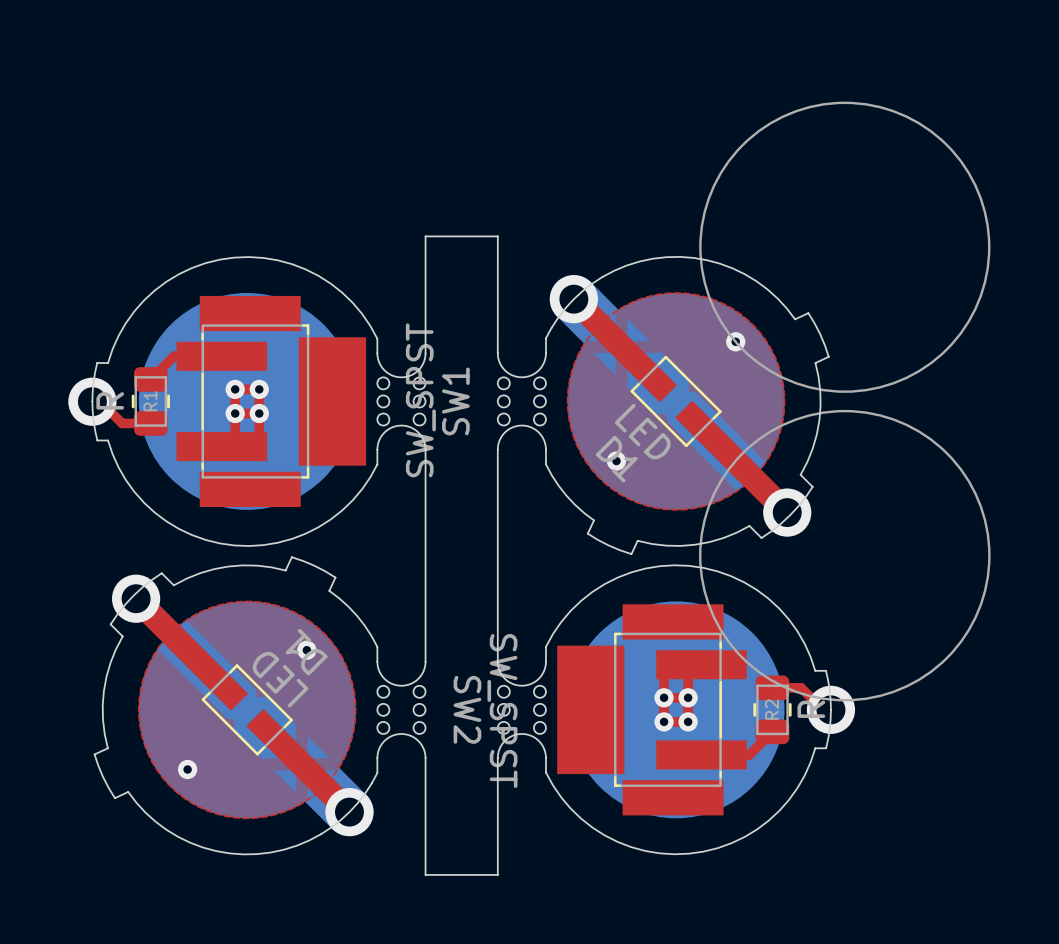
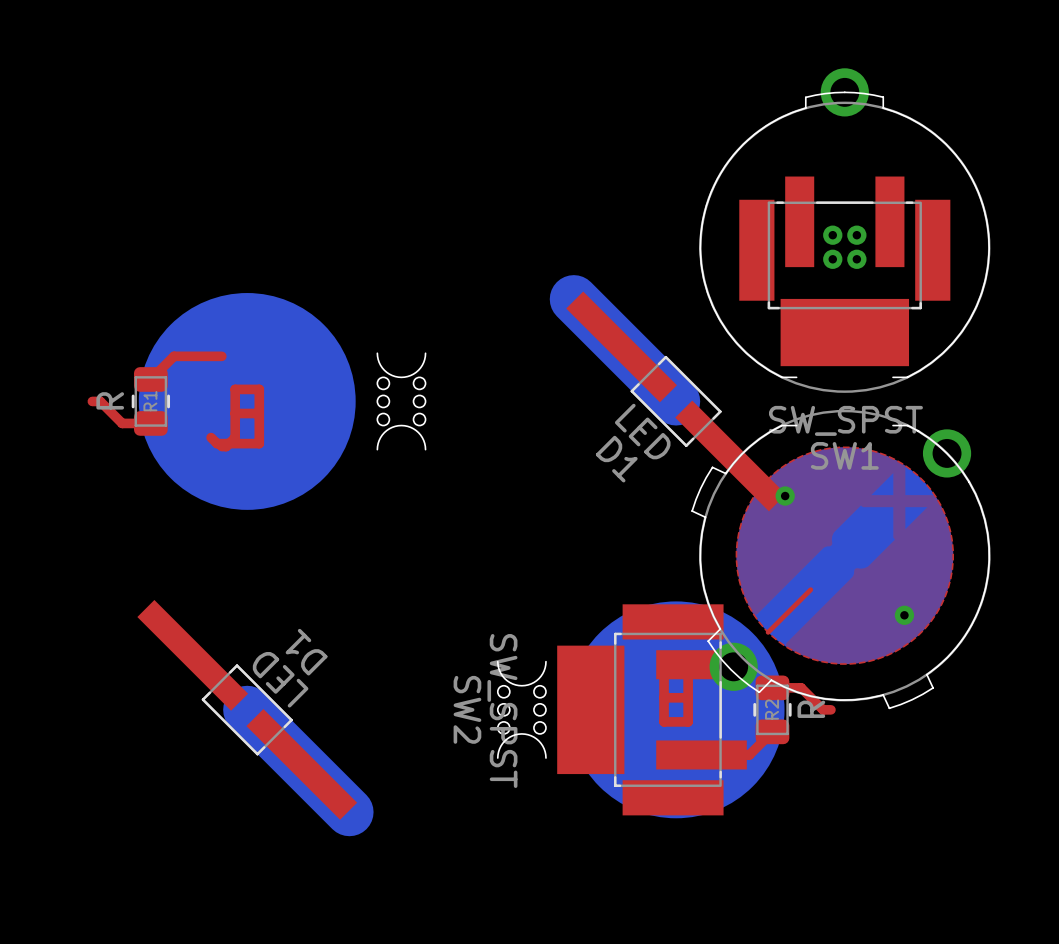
via: none -> (844, 92)
via: none -> (832, 235)
via: none -> (856, 235)
via: none -> (832, 259)
via: none -> (856, 259)
top zone outline: (671, 293) (690, 293) (708, 298) (734, 309) (749, 321) (767, 343) (776, 359) (781, 377) (784, 396) (783, 415) (779, 434) (767, 459) (756, 474) (742, 487) (717, 501) (699, 507) (680, 509) (661, 508) (643, 504) (617, 492) (602, 481) (590, 467) (575, 442) (570, 424) (567, 406) (568, 387) (572, 368) (584, 343) (596, 328) (617, 309) (634, 301) (652, 295) (671, 293) -> (840, 447) (858, 448) (877, 452) (903, 464) (918, 475) (936, 497) (944, 514) (950, 532) (953, 550) (952, 569) (948, 588) (936, 613) (924, 628) (903, 647) (886, 655) (868, 661) (849, 663) (830, 663) (812, 659) (786, 647) (771, 635) (758, 621) (744, 597) (738, 579) (736, 560) (737, 541) (741, 523) (753, 497) (764, 482) (778, 469) (803, 455) (821, 449) (840, 447)
via: (573, 299) -> none
via: (735, 341) -> none
board edge: (377, 353) (377, 338) (362, 313) (342, 292) (318, 275) (277, 260) (248, 257) (219, 259) (178, 274) (143, 300) (118, 335) (108, 363) (97, 363) (92, 401) (97, 440) (108, 440) (118, 467) (144, 502) (178, 528) (219, 543) (248, 546) (277, 542) (318, 527) (342, 510) (362, 489) (377, 464) (377, 449) -> none
board edge: (425, 353) (425, 236) (497, 236) (497, 353) -> none
board edge: (545, 353) (545, 338) (558, 317) (573, 299) (592, 283) (614, 270) (639, 261) (680, 256) (707, 260) (745, 274) (777, 298) (795, 319) (808, 313) (820, 334) (828, 356) (815, 363) (820, 391) (819, 420) (812, 448) (800, 474) (812, 486) (790, 515) (761, 538) (749, 525) (709, 542) (680, 545) (637, 540) (631, 554) (620, 550) (587, 533) (594, 520) (574, 504) (558, 485) (545, 464) (545, 449) -> none
board edge: none -> (796, 377) (781, 377) (757, 362) (735, 342) (719, 318) (707, 291) (701, 263) (702, 219) (717, 178) (743, 144) (778, 118) (805, 108) (805, 97) (844, 92) (883, 97) (883, 108) (910, 118) (945, 143) (971, 178) (986, 219) (989, 248) (985, 277) (970, 318) (953, 342) (932, 362) (907, 377) (893, 377)
via: (235, 389) -> none
via: (259, 389) -> none
via: (92, 401) -> none
SW1 rotation: 0° (271, 401) -> 90° clockwise (844, 271)
SW1 position: (271, 401) -> (844, 271)
part: (521, 401) -> none
part position: (676, 401) -> (844, 555)
via: (235, 413) -> none
via: (259, 413) -> none
board edge: none -> (796, 425) (781, 425) (760, 438) (741, 454) (725, 473) (712, 467) (695, 499) (692, 511) (705, 517) (700, 545) (704, 588) (720, 629) (708, 641) (730, 669) (759, 692) (771, 680) (797, 692) (825, 698) (854, 699) (883, 695) (889, 708) (912, 699) (933, 687) (926, 674) (956, 647) (971, 624) (982, 599) (989, 559) (984, 519) (975, 493) (962, 471) (947, 453) (928, 437) (907, 425) (893, 425)
board edge: (425, 449) (425, 661) -> none
board edge: (497, 449) (497, 661) -> none
via: none -> (947, 453)
via: (616, 461) -> none
via size: [763, 488, 812, 537] -> [775, 486, 795, 506]
top track: none -> (810, 589) (768, 632)
via: (136, 598) -> none
top zone outline: (242, 601) (261, 602) (279, 606) (305, 618) (320, 629) (333, 643) (347, 668) (353, 686) (355, 705) (354, 724) (350, 742) (338, 768) (327, 783) (305, 801) (288, 810) (270, 815) (251, 818) (233, 817) (214, 813) (188, 801) (173, 789) (155, 768) (147, 751) (141, 733) (138, 714) (139, 695) (143, 677) (155, 651) (167, 636) (181, 623) (205, 609) (223, 604) (242, 601) -> none
via: none -> (904, 615)
via: (306, 650) -> none
board edge: (377, 661) (377, 646) (364, 625) (348, 606) (329, 590) (335, 577) (303, 561) (291, 557) (285, 570) (242, 565) (213, 569) (173, 585) (161, 573) (133, 595) (110, 624) (122, 636) (110, 662) (103, 690) (103, 719) (107, 748) (94, 754) (103, 777) (114, 798) (128, 791) (155, 821) (178, 836) (216, 851) (243, 854) (283, 849) (308, 840) (331, 827) (349, 812) (365, 793) (377, 772) (377, 758) -> none
board edge: (545, 661) (545, 646) (561, 622) (581, 600) (604, 584) (631, 572) (659, 566) (703, 567) (744, 582) (779, 608) (804, 643) (815, 670) (825, 670) (830, 709) (826, 748) (815, 748) (804, 775) (779, 810) (744, 837) (703, 851) (674, 854) (645, 850) (604, 835) (581, 818) (561, 797) (545, 772) (545, 758) -> none
via: none -> (733, 666)
via: (664, 697) -> none
via: (688, 697) -> none
part: (247, 709) -> none
part: (401, 709) -> none
via: (830, 709) -> none
via: (664, 721) -> none
via: (688, 721) -> none
board edge: (425, 758) (425, 874) (497, 874) (497, 758) -> none
via: (187, 769) -> none
via: (349, 812) -> none

